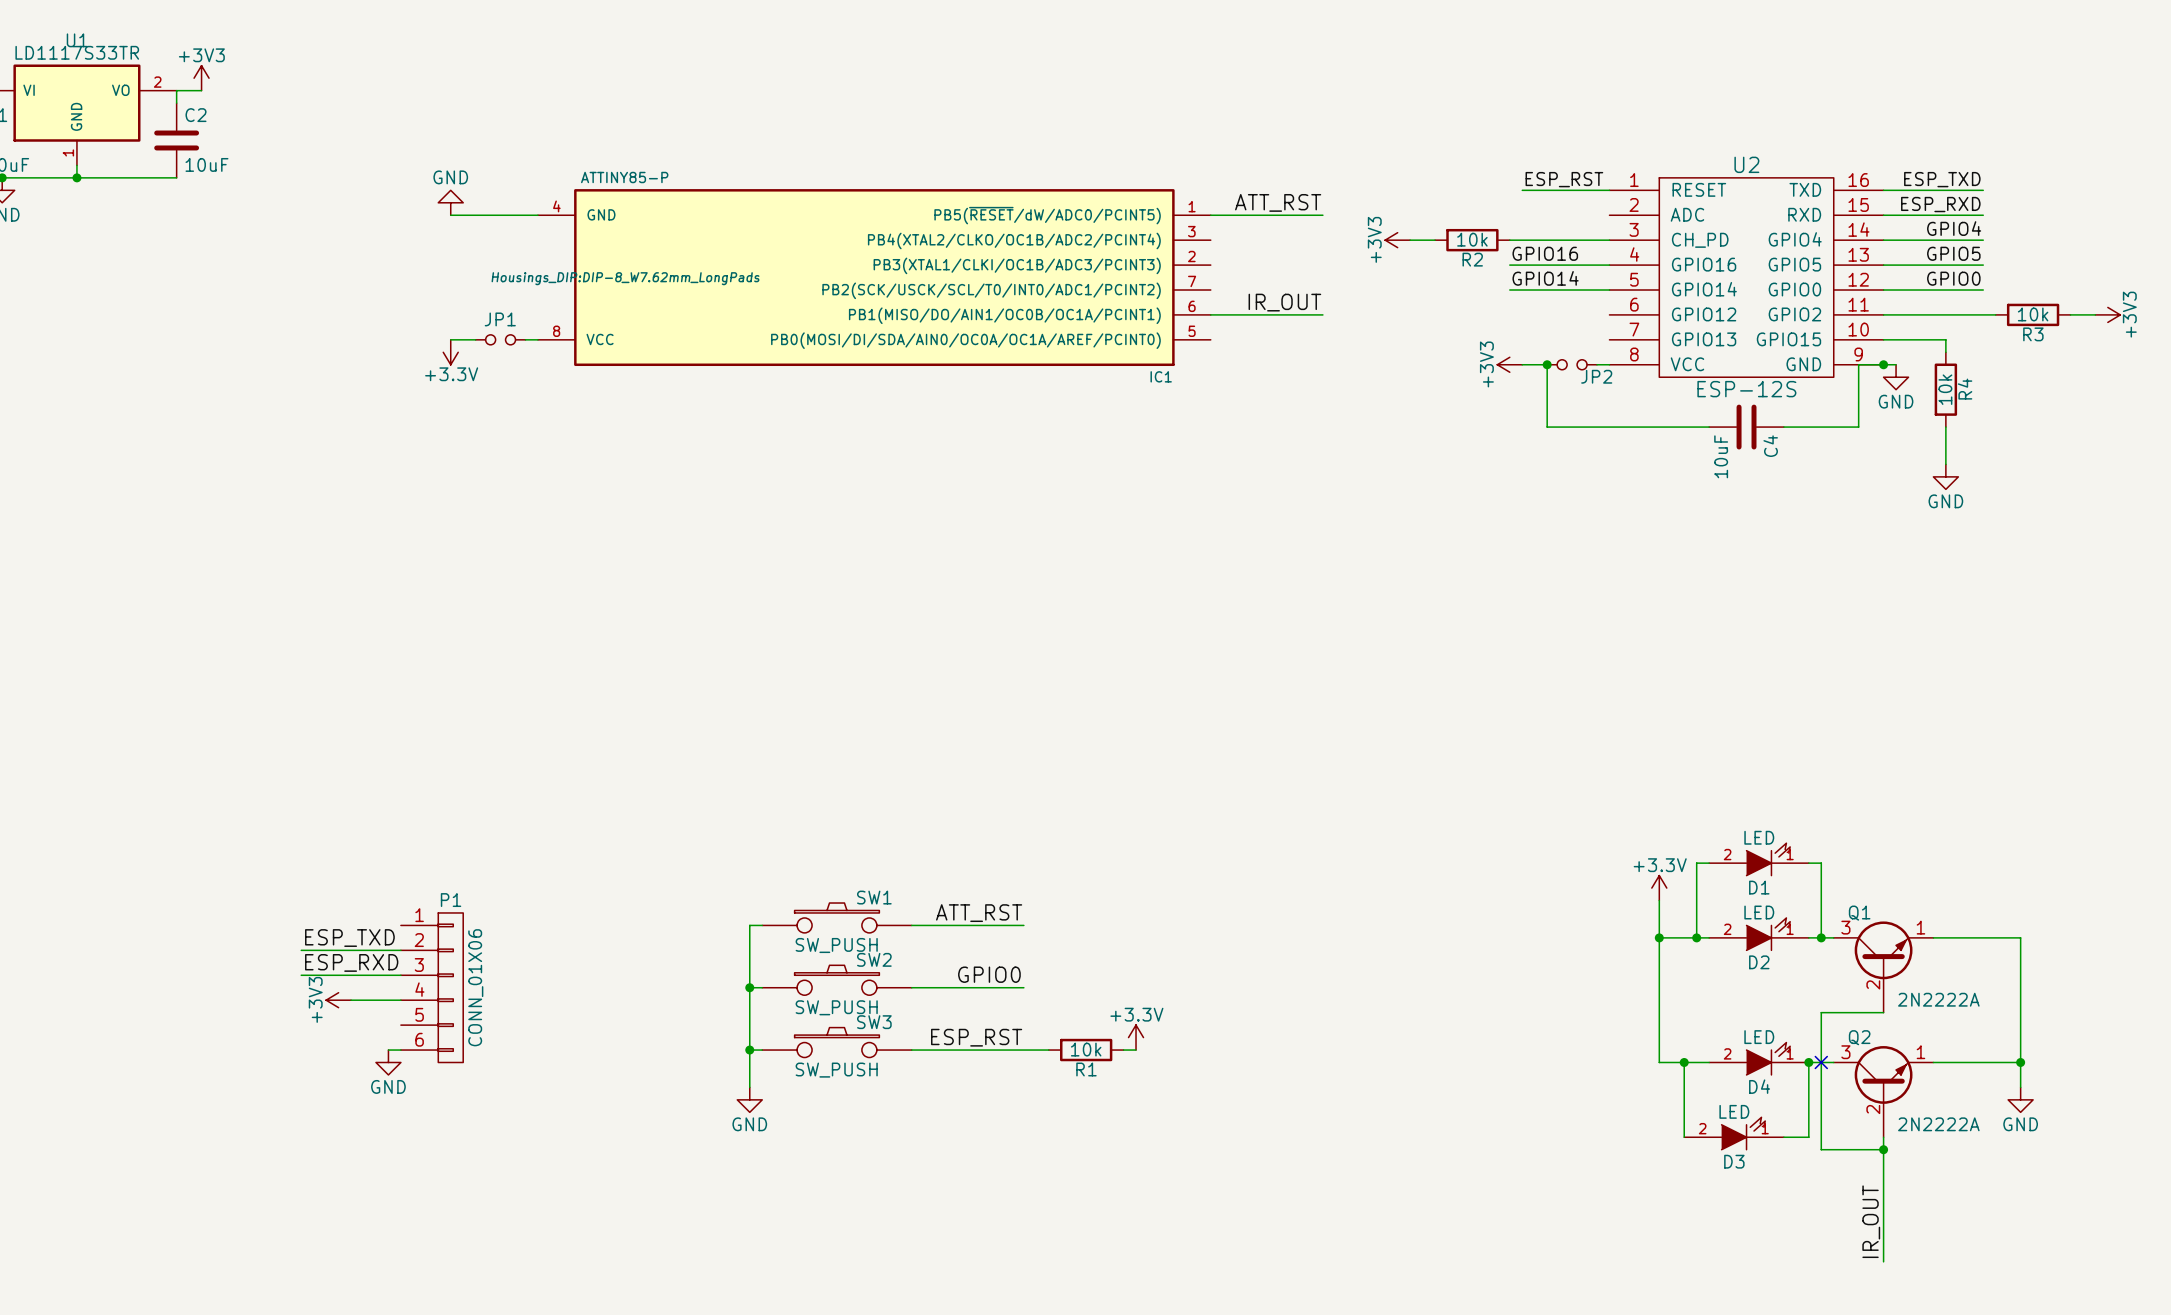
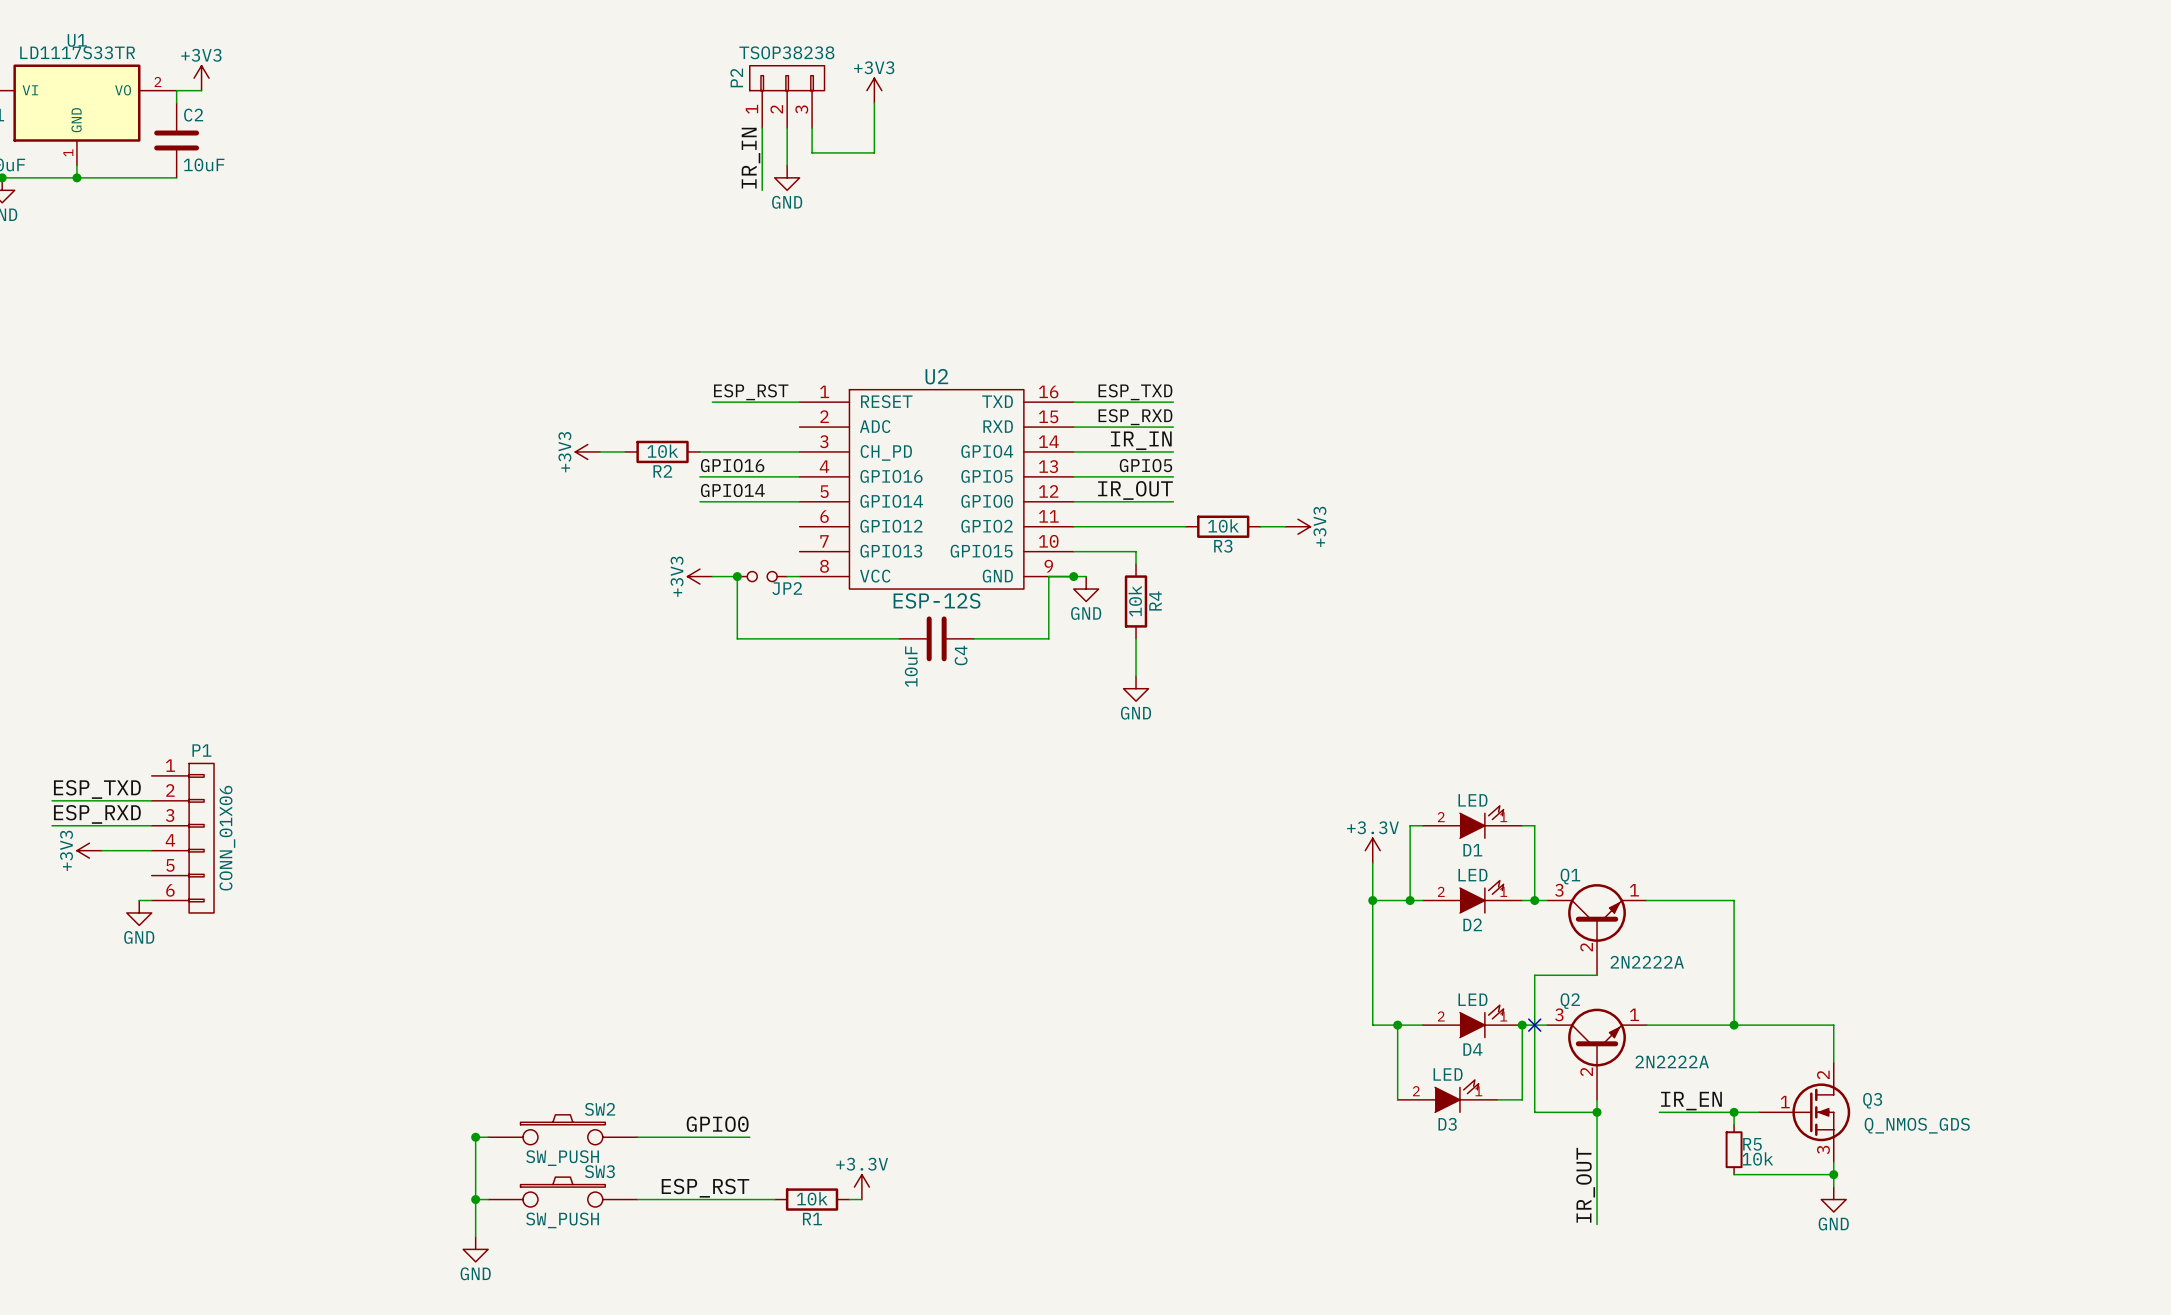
power symbol: none -> +3V3 (874, 90)
P2: none -> TSOP38238 (787, 96)
wire: none -> (874, 103) (874, 152) (812, 152) (812, 128)
wire: none -> (762, 128) (762, 190)
wire: none -> (787, 128) (787, 165)
label: none -> IR_IN (750, 158)
power symbol: none -> GND (787, 177)
label: ESP_RST (1564, 179) -> none
label: ESP_TXD (1942, 179) -> none
wire: (1522, 190) (1609, 190) -> none
wire: (1883, 190) (1983, 190) -> none
power symbol: GND (450, 202) -> none
label: ATT_RST (1278, 202) -> none
label: ESP_RXD (1940, 204) -> none
wire: (450, 215) (537, 215) -> none
wire: (1210, 215) (1322, 215) -> none
wire: (1883, 215) (1983, 215) -> none
label: GPIO4 (1954, 228) -> none
power symbol: +3V3 (1397, 240) -> none
wire: (1410, 240) (1435, 240) -> none
R2 position: (1472, 240) -> (662, 451)
wire: (1509, 240) (1609, 240) -> none
wire: (1883, 240) (1983, 240) -> none
label: GPIO16 (1545, 253) -> none
label: GPIO5 (1953, 253) -> none
wire: (1509, 265) (1609, 265) -> none
wire: (1883, 265) (1983, 265) -> none
IC1: ATTINY85-P (874, 277) -> none
U2 position: (1746, 277) -> (936, 489)
label: GPIO14 (1545, 278) -> none
label: GPIO0 (1953, 278) -> none
wire: (1509, 290) (1609, 290) -> none
wire: (1883, 290) (1983, 290) -> none
label position: IR_OUT (1284, 302) -> IR_OUT (1135, 490)
wire: (1210, 314) (1322, 314) -> none
wire: (1883, 314) (1995, 314) -> none
R3 position: (2033, 314) -> (1223, 526)
wire: (2070, 314) (2095, 314) -> none
power symbol: +3V3 (2107, 314) -> none
wire: (450, 339) (475, 339) -> (600, 451) (625, 451)
JP1: (500, 339) -> none
wire: (525, 339) (537, 339) -> none
wire: (1883, 339) (1945, 339) (1945, 352) -> none
power symbol: +3.3V (450, 352) -> none
power symbol: +3V3 (1509, 364) -> none
wire: (1522, 364) (1547, 364) (1547, 427) (1709, 427) -> none
junction: (1547, 364) -> none
JP2 position: (1572, 364) -> (762, 576)
wire: (1597, 364) (1609, 364) -> none
junction: (1883, 364) -> none
wire: (1896, 364) (1858, 364) (1858, 427) (1783, 427) -> none
power symbol: GND (1896, 377) -> none
R4 position: (1945, 389) -> (1136, 601)
label: none -> ESP_RST (751, 392)
label: none -> ESP_TXD (1135, 392)
wire: none -> (712, 402) (799, 402)
wire: none -> (1073, 402) (1173, 402)
label: none -> ESP_RXD (1135, 417)
wire: none -> (1073, 427) (1173, 427)
C4 position: (1746, 427) -> (936, 638)
wire: (1945, 427) (1945, 464) -> none
label: none -> IR_IN (1141, 440)
power symbol: none -> +3V3 (587, 451)
wire: none -> (699, 451) (799, 451)
wire: none -> (1073, 451) (1173, 451)
label: none -> GPIO16 (732, 465)
label: none -> GPIO5 (1145, 465)
wire: none -> (699, 476) (799, 476)
wire: none -> (1073, 476) (1173, 476)
power symbol: GND (1945, 476) -> none
label: none -> GPIO14 (732, 490)
wire: none -> (699, 501) (799, 501)
wire: none -> (1073, 501) (1173, 501)
wire: none -> (1073, 526) (1185, 526)
wire: none -> (1260, 526) (1285, 526)
power symbol: none -> +3V3 (1297, 526)
wire: none -> (1073, 551) (1136, 551) (1136, 564)
power symbol: none -> +3V3 (699, 576)
wire: none -> (712, 576) (737, 576) (737, 638) (899, 638)
junction: none -> (737, 576)
wire: none -> (787, 576) (799, 576)
junction: none -> (1073, 576)
wire: none -> (1086, 576) (1048, 576) (1048, 638) (974, 638)
power symbol: none -> GND (1086, 589)
wire: none -> (1136, 638) (1136, 676)
power symbol: none -> GND (1136, 688)
label: none -> ESP_TXD (97, 789)
wire: none -> (52, 800) (151, 800)
label: none -> ESP_RXD (97, 814)
wire: none -> (52, 825) (151, 825)
wire: none -> (1422, 825) (1410, 825) (1410, 900)
wire: none -> (1522, 825) (1534, 825) (1534, 900)
power symbol: none -> +3V3 (89, 850)
wire: none -> (101, 850) (151, 850)
power symbol: none -> +3.3V (1372, 850)
D1 position: (1758, 859) -> (1472, 822)
wire: none -> (1372, 863) (1372, 1025) (1422, 1025)
wire: (1709, 863) (1696, 863) (1696, 937) -> none
wire: (1808, 863) (1821, 863) (1821, 937) -> none
power symbol: +3.3V (1659, 888) -> none
wire: none -> (139, 900) (151, 900)
wire: none -> (1372, 900) (1422, 900)
junction: none -> (1372, 900)
junction: none -> (1410, 900)
wire: none -> (1522, 900) (1547, 900)
junction: none -> (1534, 900)
wire: none -> (1646, 900) (1734, 900) (1734, 1025)
wire: (1659, 900) (1659, 1062) (1709, 1062) -> none
power symbol: none -> GND (139, 912)
label: ATT_RST (979, 913) -> none
SW1: SW_PUSH (836, 917) -> none
wire: (762, 925) (749, 925) (749, 1087) -> none
wire: (911, 925) (1023, 925) -> none
D2 position: (1758, 934) -> (1472, 896)
wire: (1659, 937) (1709, 937) -> none
junction: (1659, 937) -> none
junction: (1696, 937) -> none
wire: (1808, 937) (1833, 937) -> none
junction: (1821, 937) -> none
wire: (1933, 937) (2020, 937) (2020, 1087) -> none
label: ESP_TXD (349, 938) -> none
wire: (301, 950) (400, 950) -> none
label: ESP_RXD (351, 962) -> none
Q1 position: (1883, 967) -> (1597, 929)
label: GPIO0 (989, 974) -> none
wire: (301, 975) (400, 975) -> none
wire: none -> (1597, 975) (1534, 975) (1534, 1112) (1597, 1112)
SW2 position: (836, 980) -> (562, 1129)
P1 position: (432, 987) -> (182, 838)
wire: (749, 987) (762, 987) -> none
junction: (749, 987) -> none
wire: (911, 987) (1023, 987) -> none
power symbol: +3V3 (338, 1000) -> none
wire: (351, 1000) (400, 1000) -> none
wire: (1883, 1012) (1821, 1012) (1821, 1149) (1883, 1149) -> none
wire: none -> (1397, 1025) (1397, 1099)
junction: none -> (1397, 1025)
junction: none -> (1522, 1025)
no-connect mark: none -> (1534, 1025)
wire: none -> (1547, 1025) (1522, 1025) (1522, 1099) (1497, 1099)
junction: none -> (1734, 1025)
label: ESP_RST (976, 1037) -> none
power symbol: +3.3V (1136, 1037) -> none
SW3 position: (836, 1042) -> (562, 1192)
wire: (388, 1050) (400, 1050) -> (475, 1199) (488, 1199)
wire: (749, 1050) (762, 1050) -> (849, 1199) (861, 1199)
junction: (749, 1050) -> none
wire: (911, 1050) (1048, 1050) -> none
R1 position: (1086, 1050) -> (812, 1199)
wire: (1123, 1050) (1136, 1050) -> none
D4 position: (1758, 1058) -> (1472, 1021)
power symbol: GND (388, 1062) -> none
wire: (1684, 1062) (1684, 1137) -> none
junction: (1684, 1062) -> none
junction: (1808, 1062) -> none
no-connect mark: (1821, 1062) -> none
wire: (1833, 1062) (1808, 1062) (1808, 1137) (1783, 1137) -> (1833, 1062) (1833, 1025) (1646, 1025)
wire: (1933, 1062) (2020, 1062) -> none
junction: (2020, 1062) -> none
Q2 position: (1883, 1091) -> (1597, 1054)
power symbol: GND (749, 1099) -> none
wire: none -> (1597, 1099) (1597, 1224)
power symbol position: GND (2020, 1099) -> GND (1833, 1199)
label: none -> IR_EN (1691, 1101)
junction: none -> (1597, 1112)
wire: none -> (1659, 1112) (1758, 1112)
wire: none -> (1734, 1112) (1734, 1124)
junction: none -> (1734, 1112)
Q3: none -> Q_NMOS_GDS (1804, 1112)
label: none -> GPIO0 (717, 1124)
Q2 value position: 2N2222A (1938, 1124) -> 2N2222A (1672, 1061)
D3 position: (1734, 1133) -> (1447, 1096)
junction: none -> (475, 1137)
wire: none -> (488, 1137) (475, 1137) (475, 1236)
wire: none -> (637, 1137) (749, 1137)
wire: (1883, 1137) (1883, 1261) -> none
R5: none -> 10k (1734, 1149)
junction position: (1883, 1149) -> (1833, 1174)
wire: none -> (1833, 1162) (1833, 1187)
wire: none -> (1734, 1174) (1833, 1174)
label: none -> IR_OUT (1585, 1185)
label: none -> ESP_RST (705, 1188)
power symbol: none -> +3.3V (861, 1187)
junction: none -> (475, 1199)
wire: none -> (637, 1199) (774, 1199)
label: IR_OUT (1871, 1221) -> none
power symbol: none -> GND (475, 1249)

